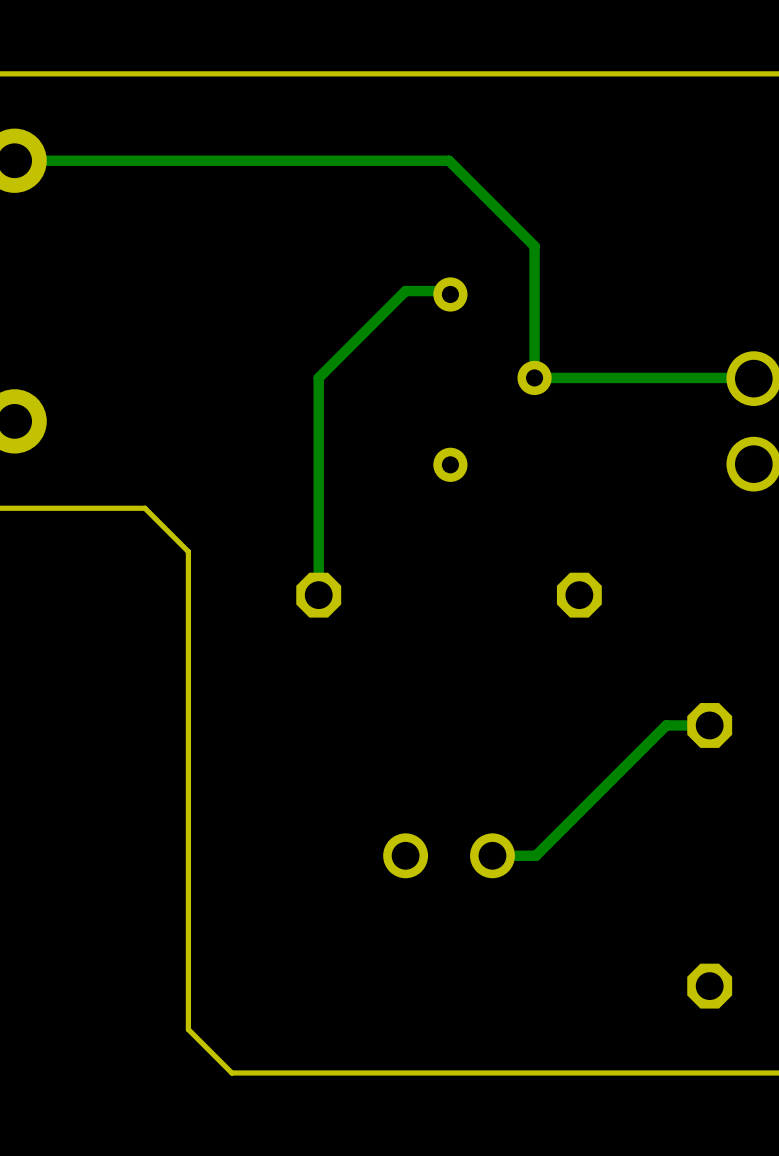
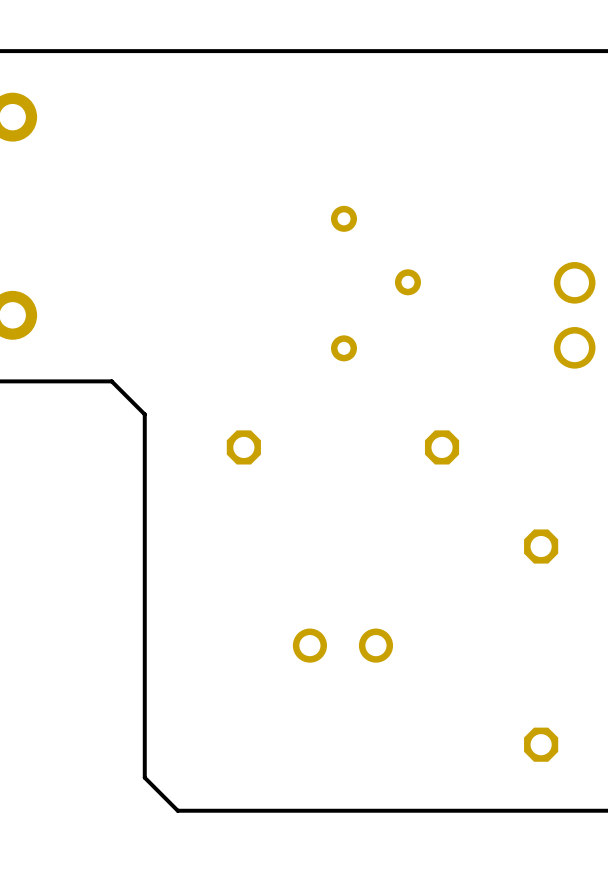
track: (14, 160) (449, 160) (534, 246) (534, 377) (753, 378) -> none
track: (450, 294) (446, 291) (405, 291) (318, 377) (318, 595) -> none
track: (709, 725) (666, 725) (535, 855) (492, 855) -> none

